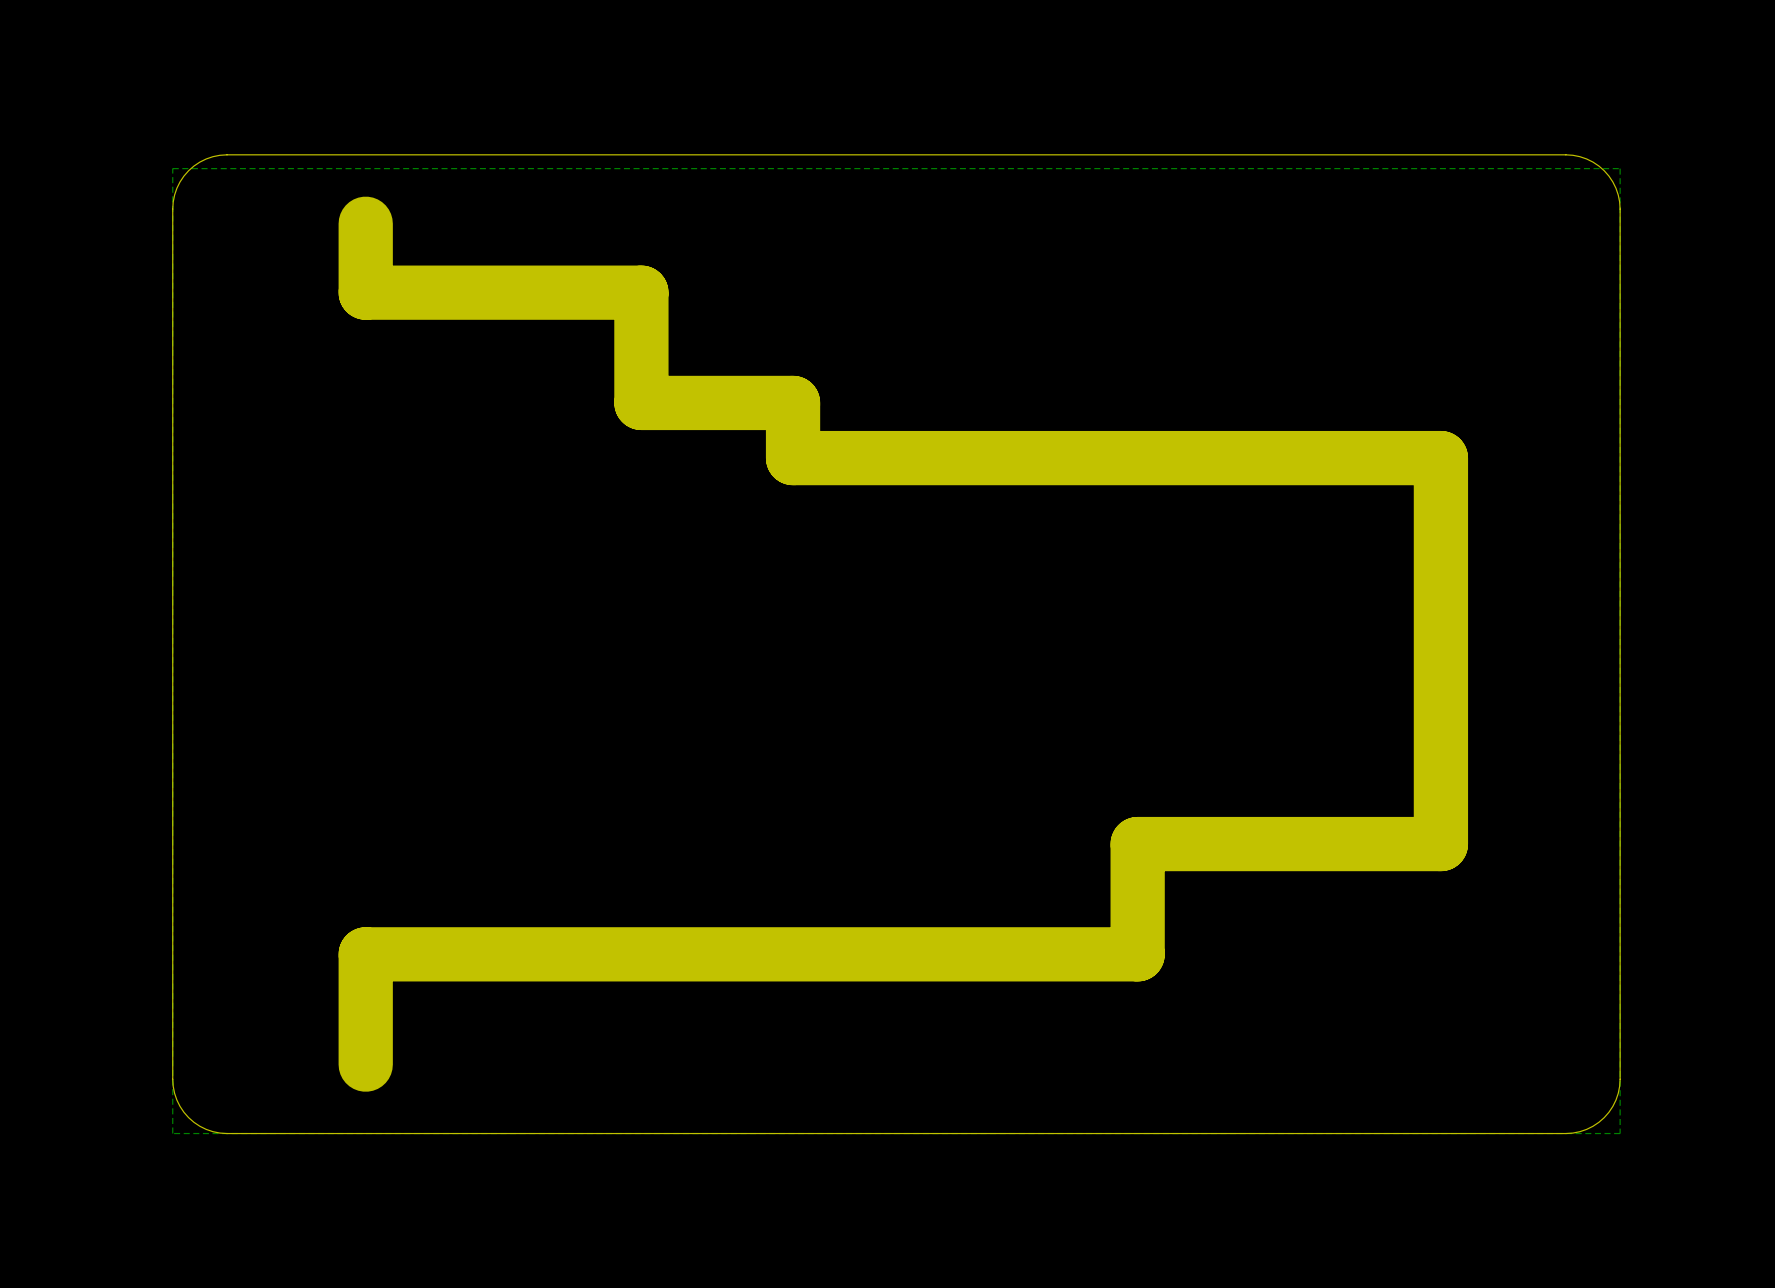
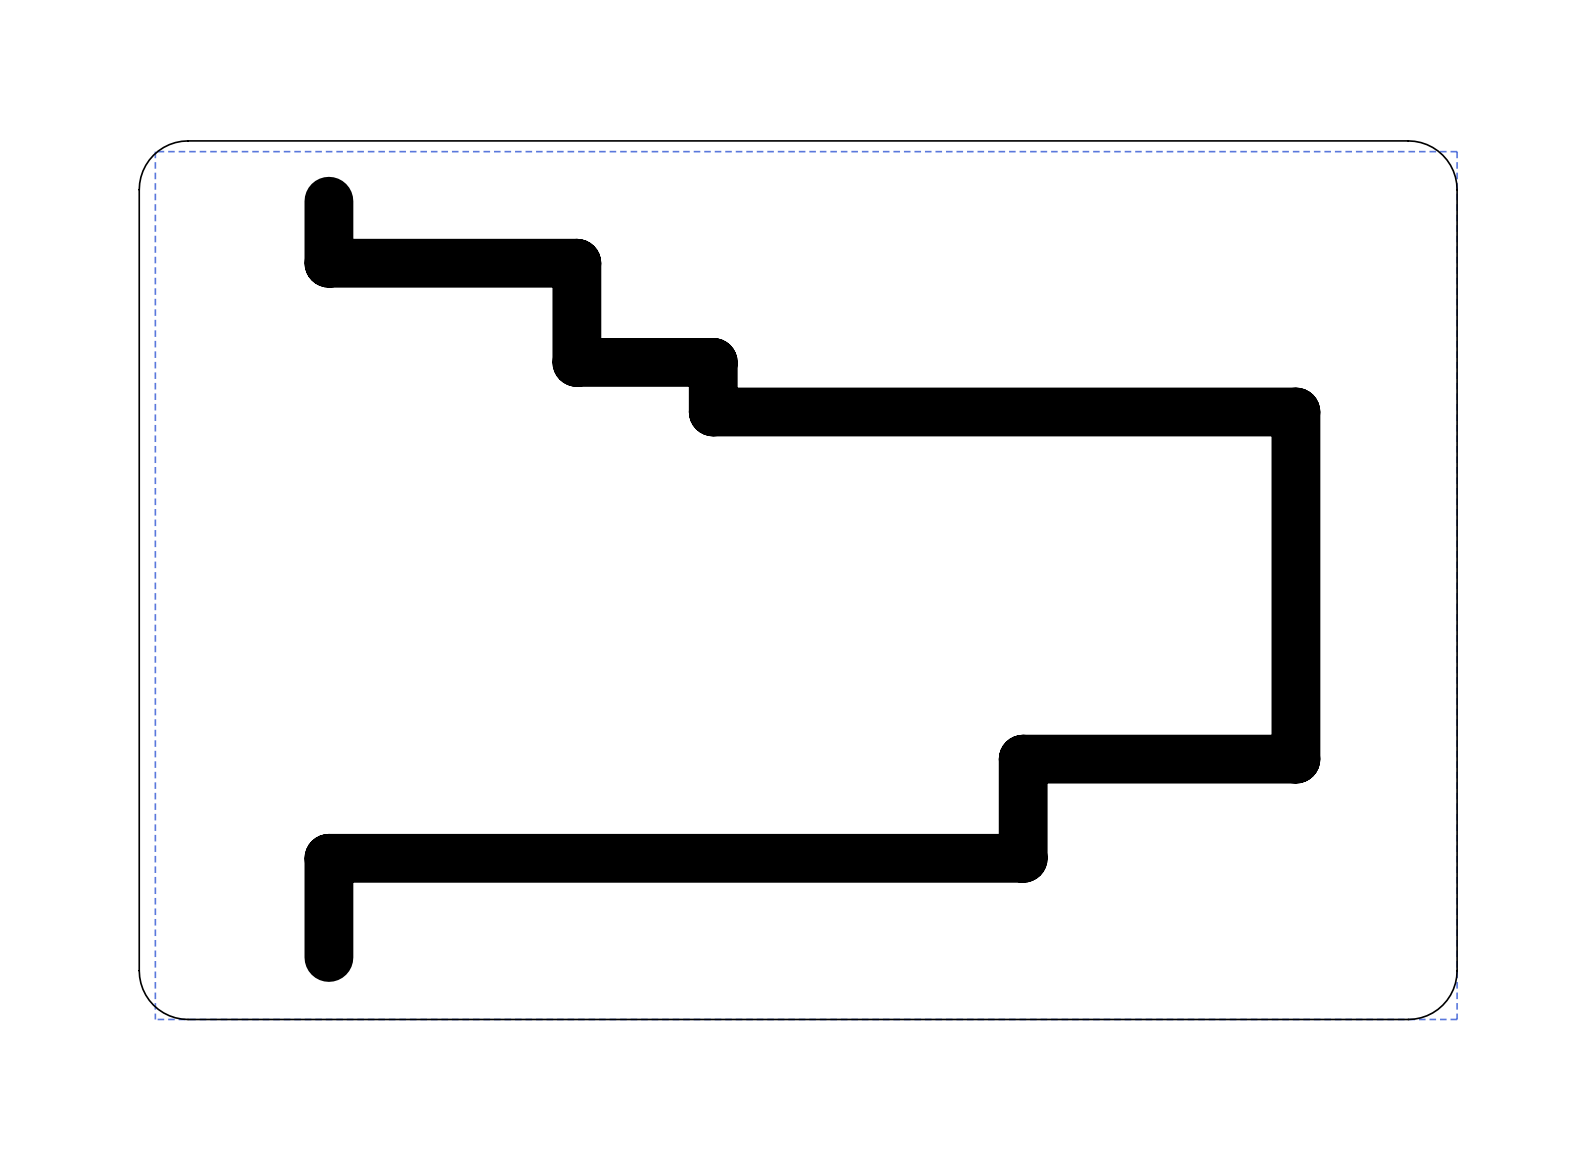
board edge: (1620, 210) (1615, 188) (1604, 170) (1586, 158) (1565, 154) (227, 154) (212, 156) (199, 162) (188, 170) (180, 181) (174, 195) (172, 209) (172, 1079) (176, 1100) (188, 1117) (206, 1129) (227, 1133) -> (1457, 189) (1453, 171) (1442, 155) (1426, 144) (1408, 140) (188, 140) (175, 142) (163, 147) (153, 155) (145, 165) (140, 177) (139, 189) (139, 970) (142, 989) (149, 1000) (158, 1009) (175, 1017) (204, 1019)

